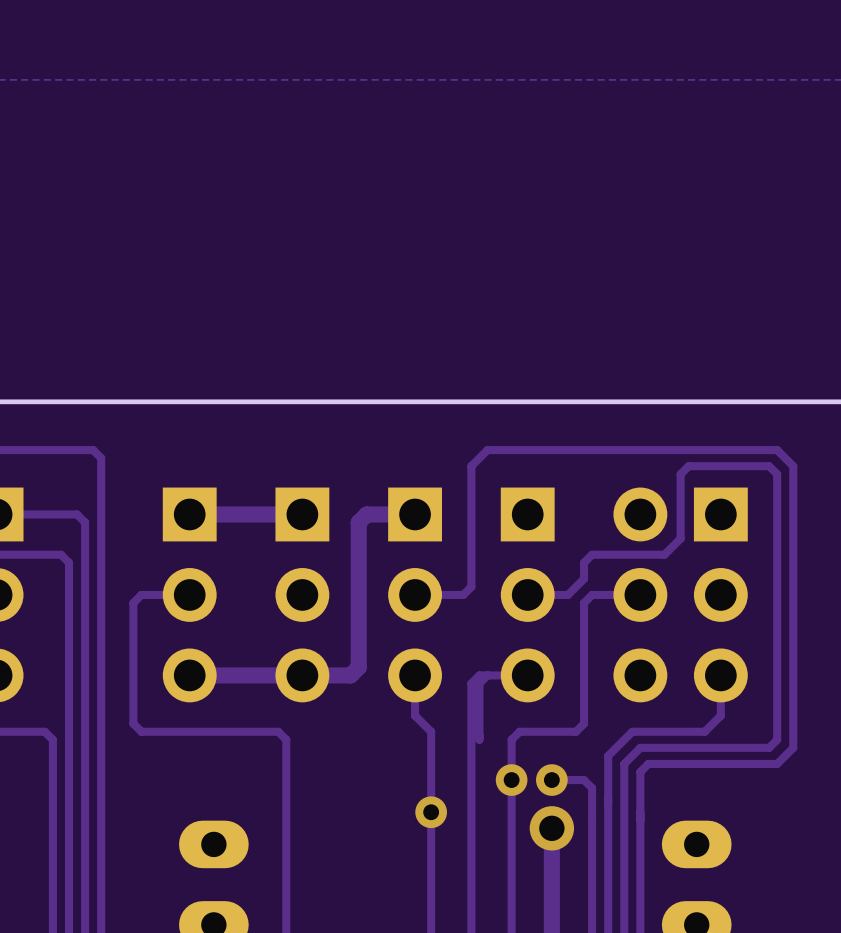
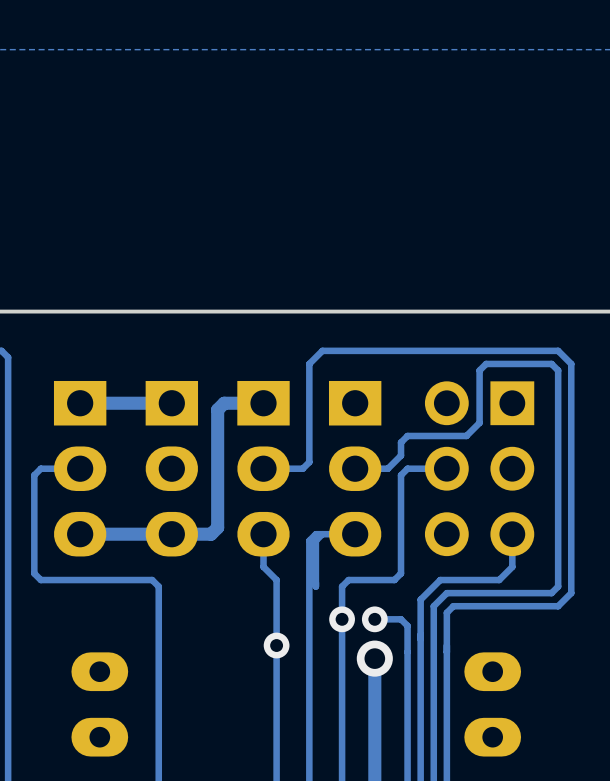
part footprint: [162, 487, 217, 703] -> [53, 380, 107, 557]
part footprint: [275, 487, 330, 703] -> [145, 380, 199, 557]
part footprint: [388, 487, 442, 703] -> [237, 380, 290, 557]
part footprint: [500, 487, 555, 703] -> [328, 380, 382, 557]

